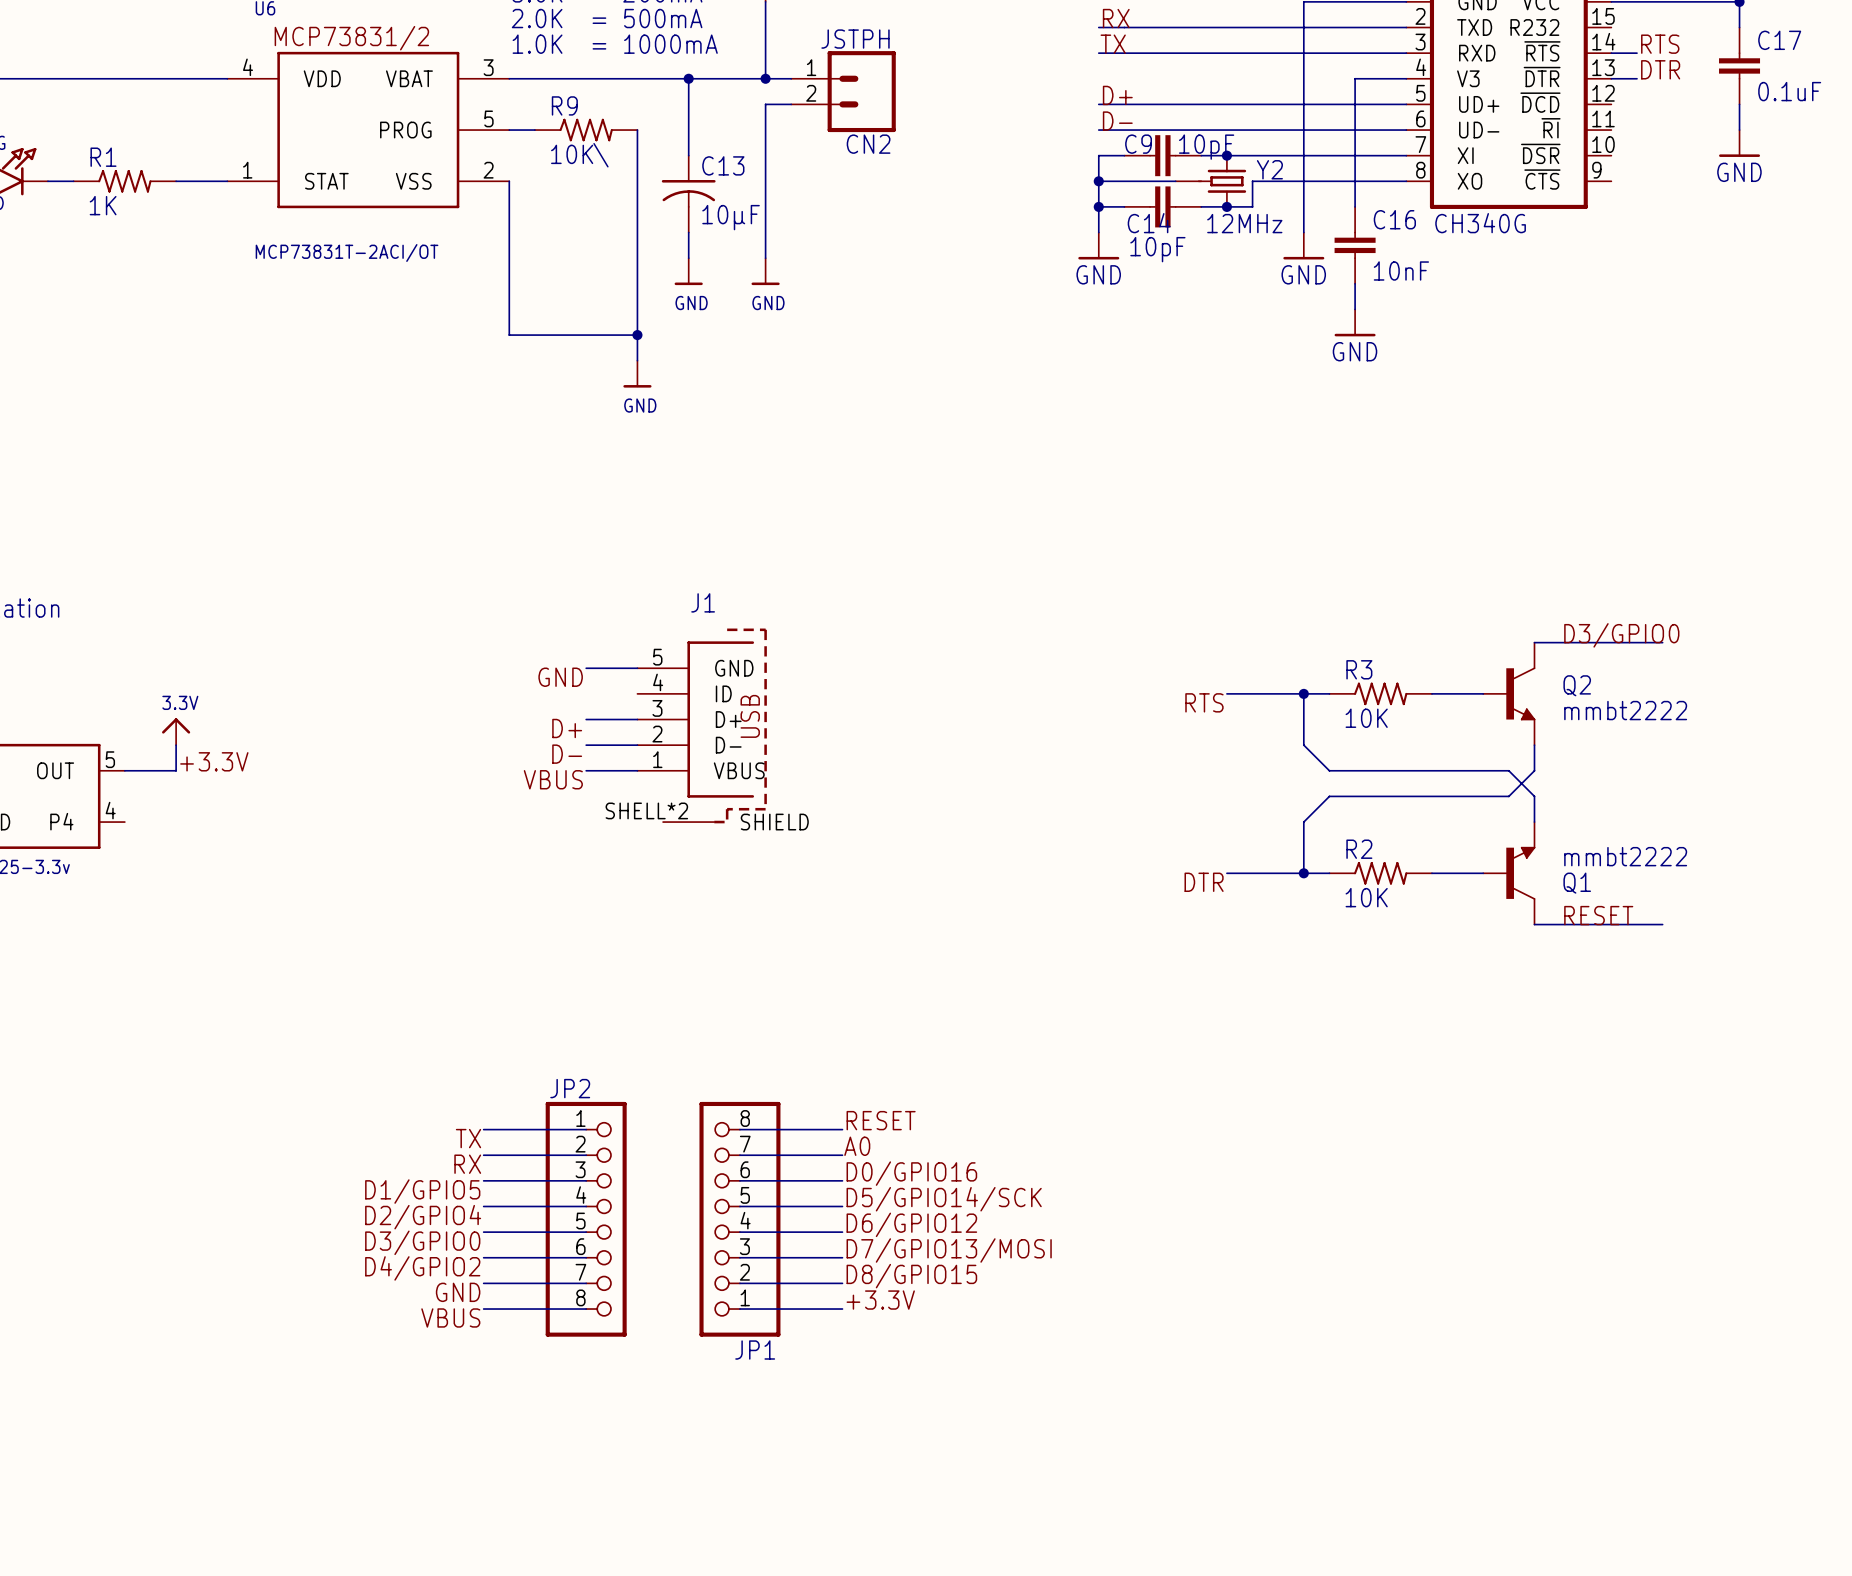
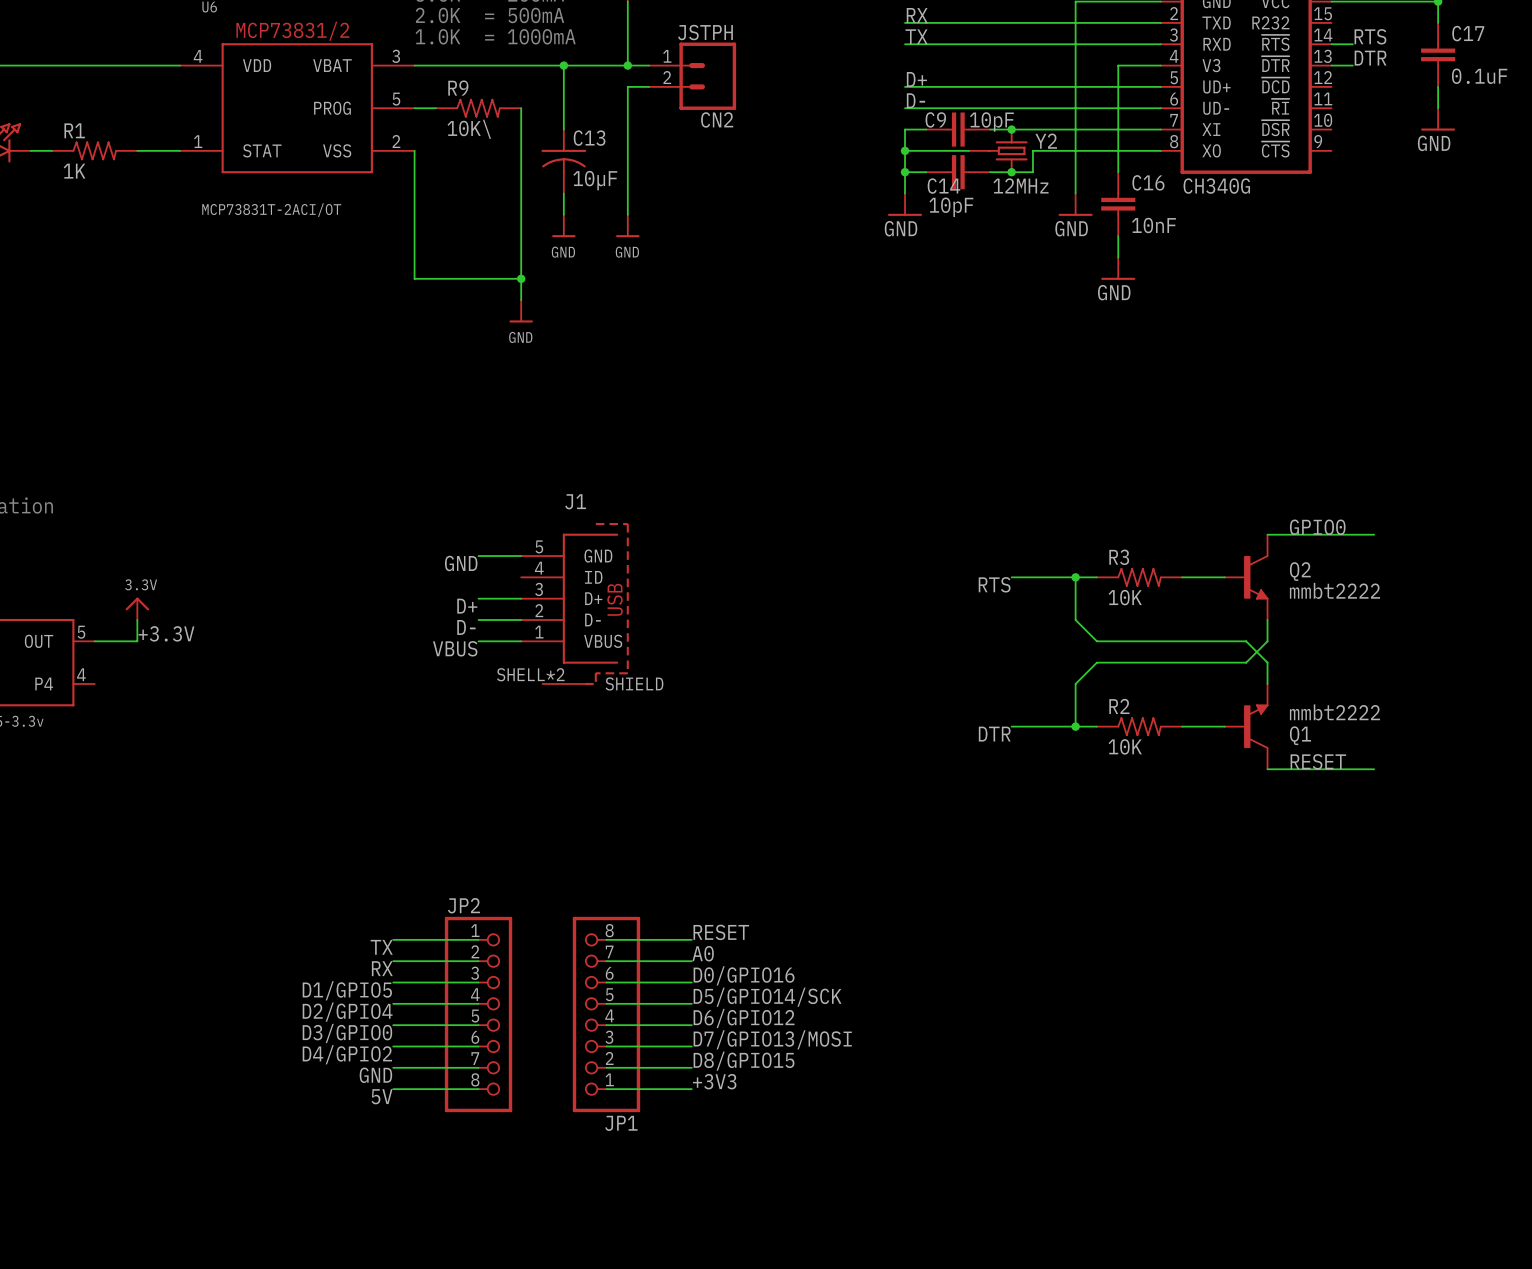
label: D3/GPIO0 (1621, 635) -> GPIO0 (1317, 527)
label: +3.3V (880, 1300) -> +3V3 (714, 1081)
label: VBUS (450, 1317) -> 5V (382, 1096)

